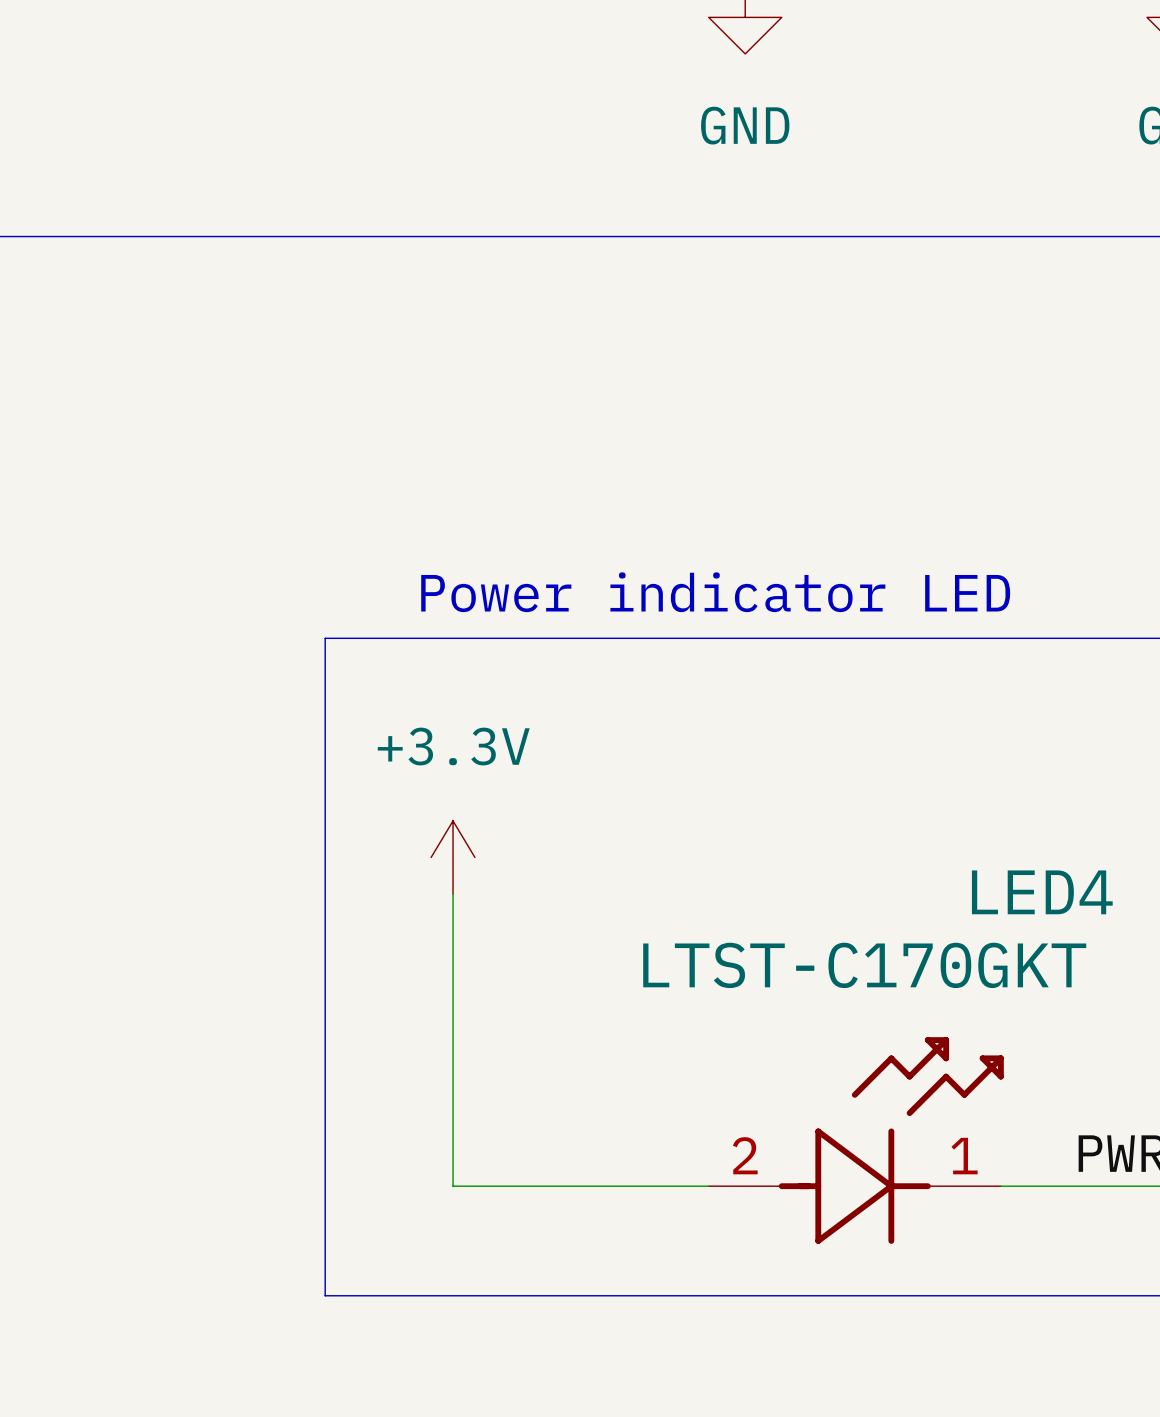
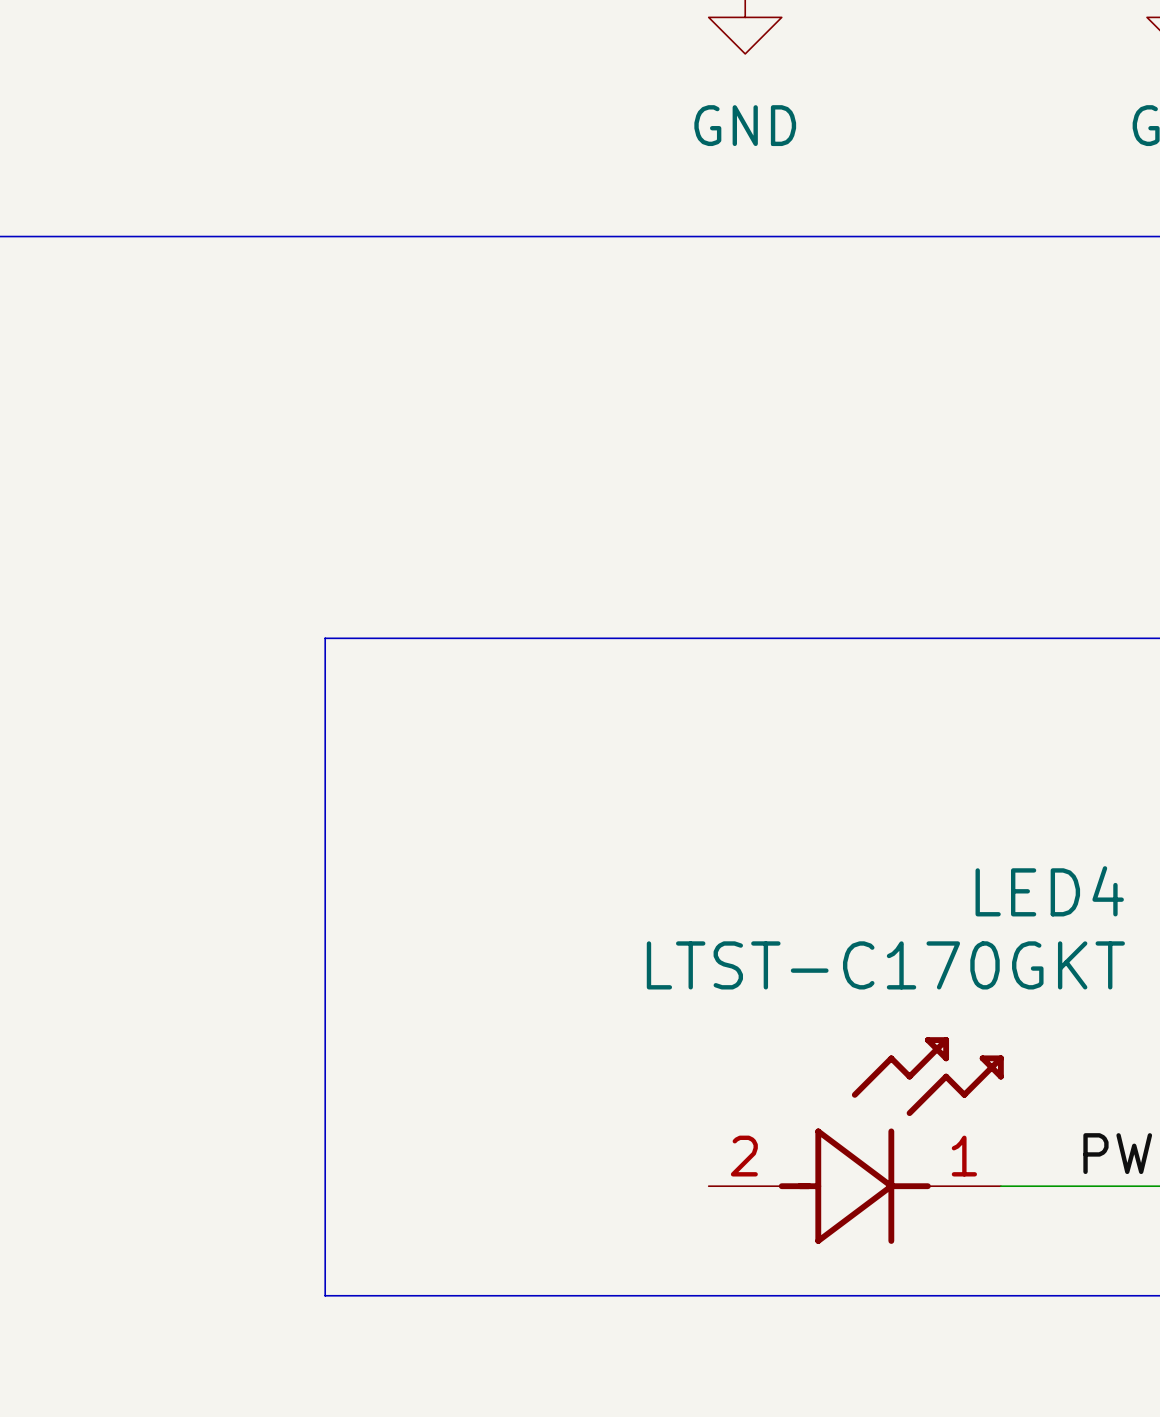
text: Power indicator LED (715, 592) -> none
power symbol: +3.3V (453, 857) -> none
wire: (453, 893) (453, 1186) (708, 1186) -> none

